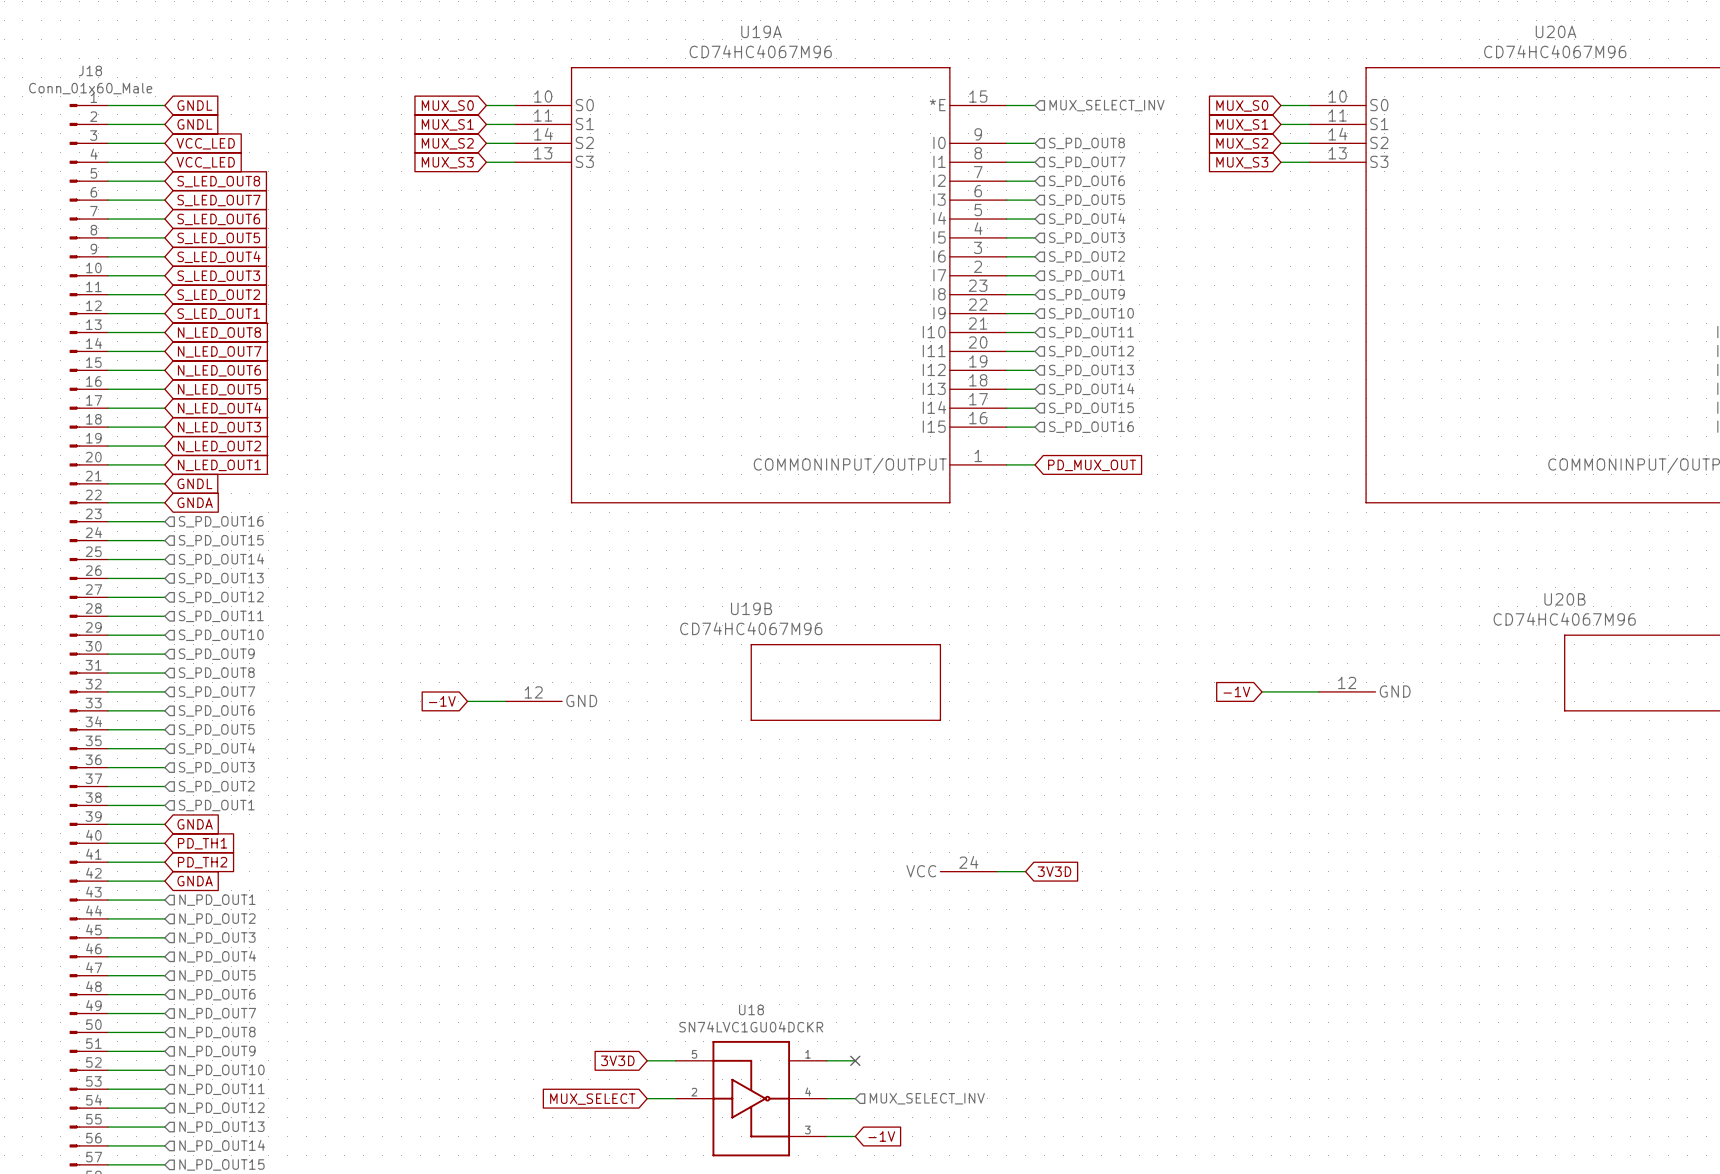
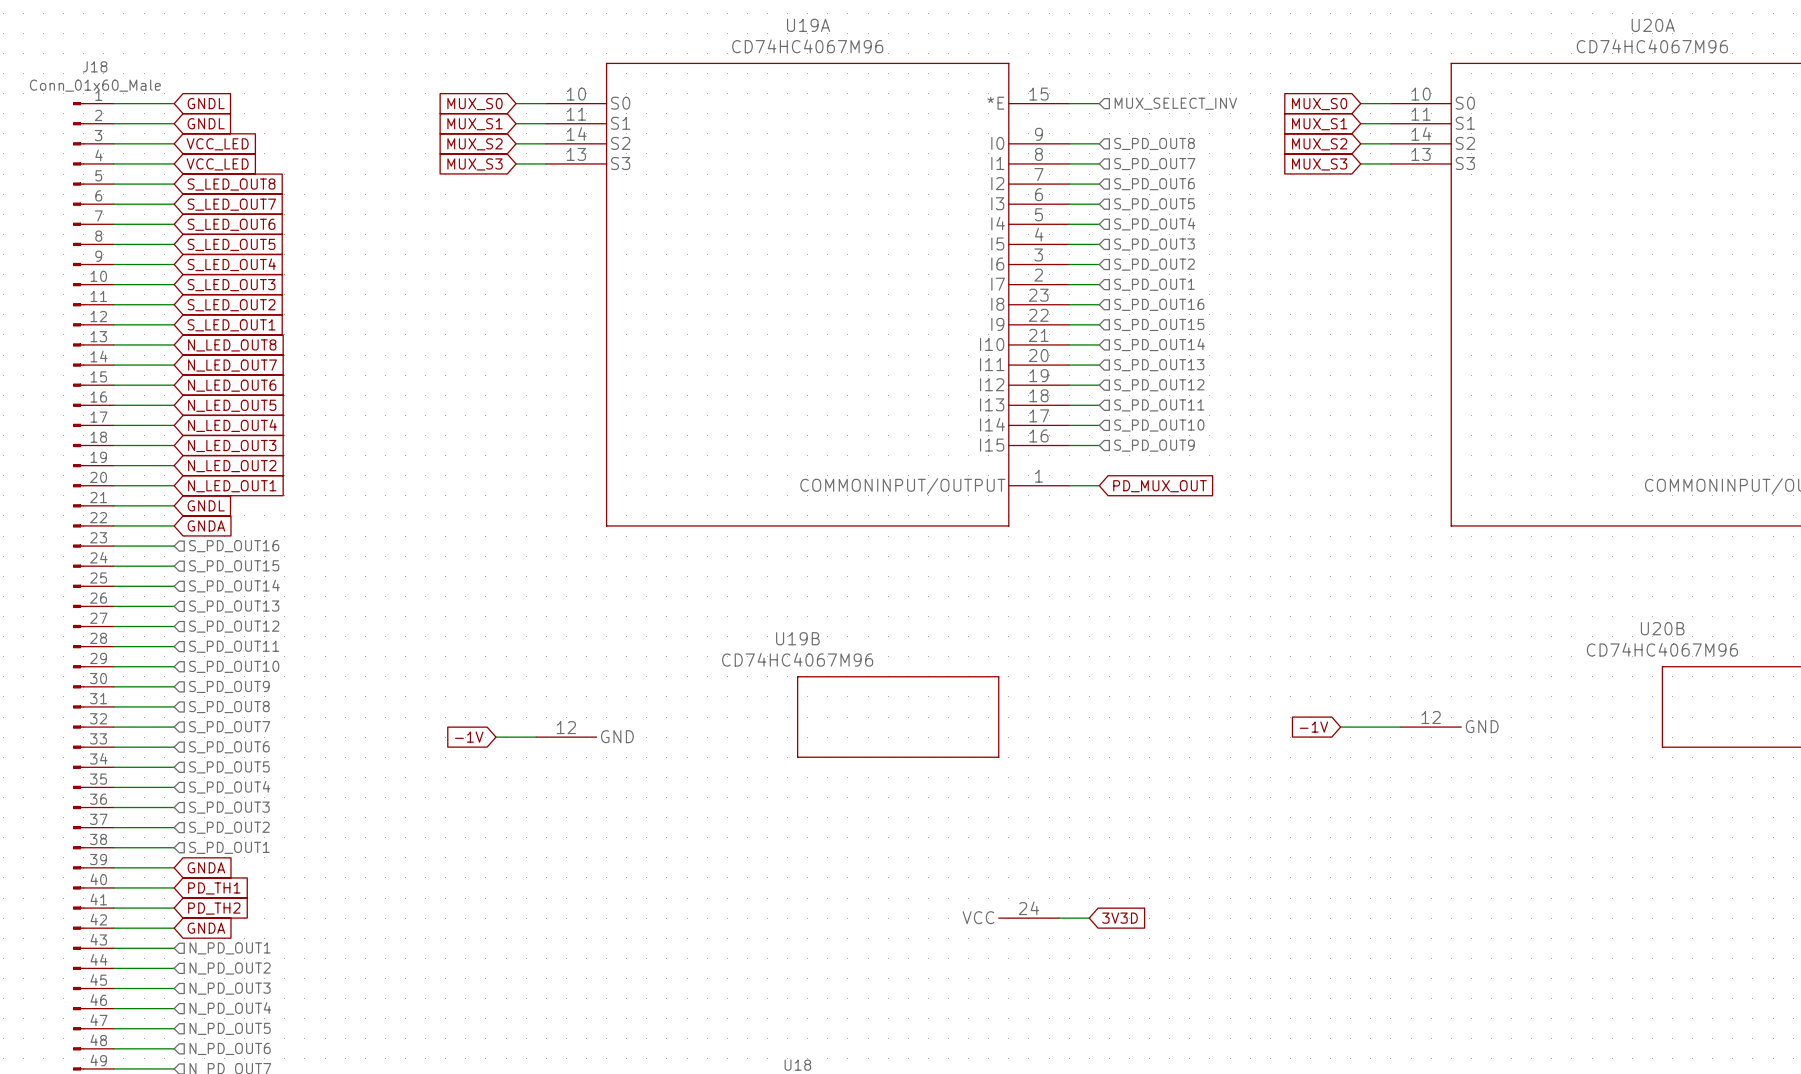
hierarchical label: S_PD_OUT9 (1086, 294) -> S_PD_OUT16 (1159, 304)
hierarchical label: S_PD_OUT10 (1091, 313) -> S_PD_OUT15 (1159, 324)
hierarchical label: S_PD_OUT11 (1091, 332) -> S_PD_OUT14 (1159, 344)
hierarchical label: S_PD_OUT12 (1091, 351) -> S_PD_OUT13 (1159, 365)
hierarchical label: S_PD_OUT13 (1091, 370) -> S_PD_OUT12 (1159, 385)
hierarchical label: S_PD_OUT14 (1091, 389) -> S_PD_OUT11 (1159, 405)
hierarchical label: S_PD_OUT15 (1091, 408) -> S_PD_OUT10 (1159, 425)
hierarchical label: S_PD_OUT16 (1091, 427) -> S_PD_OUT9 (1154, 445)

